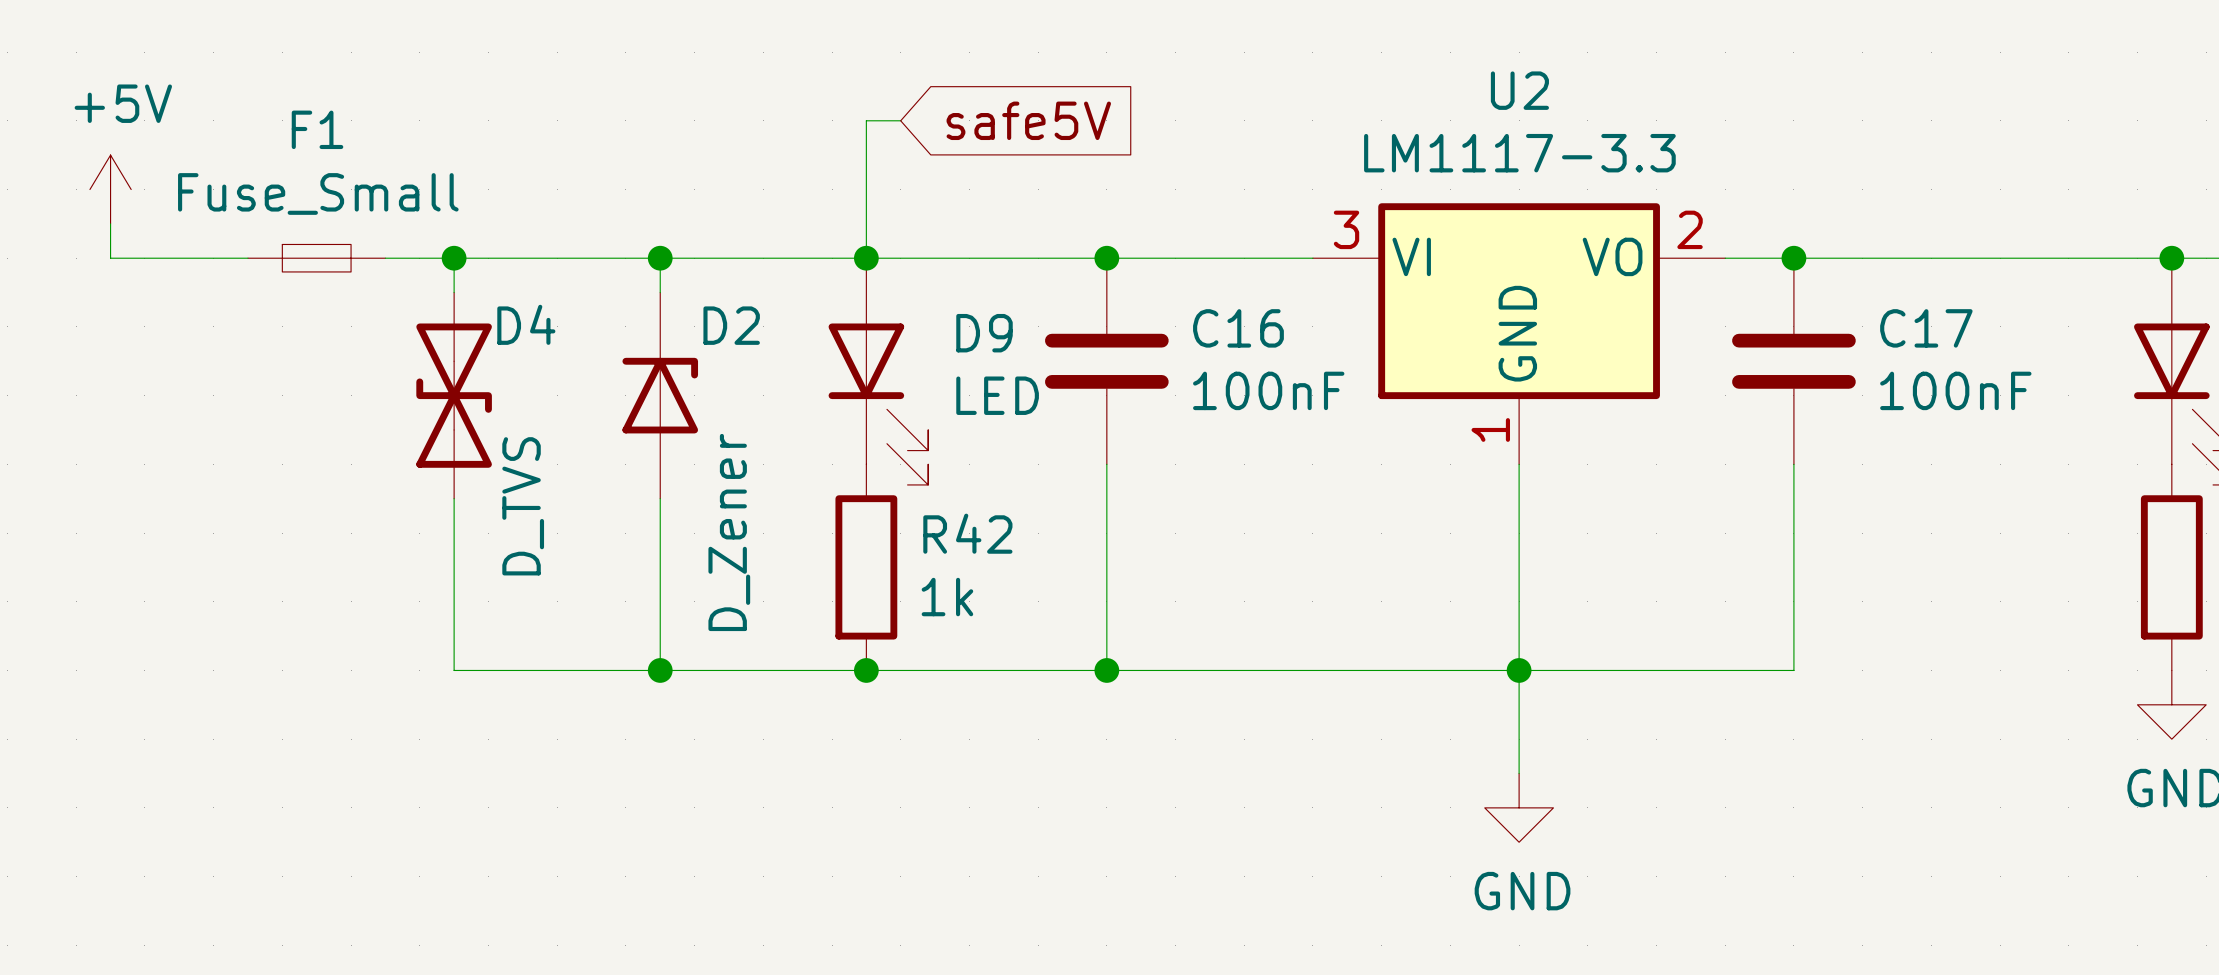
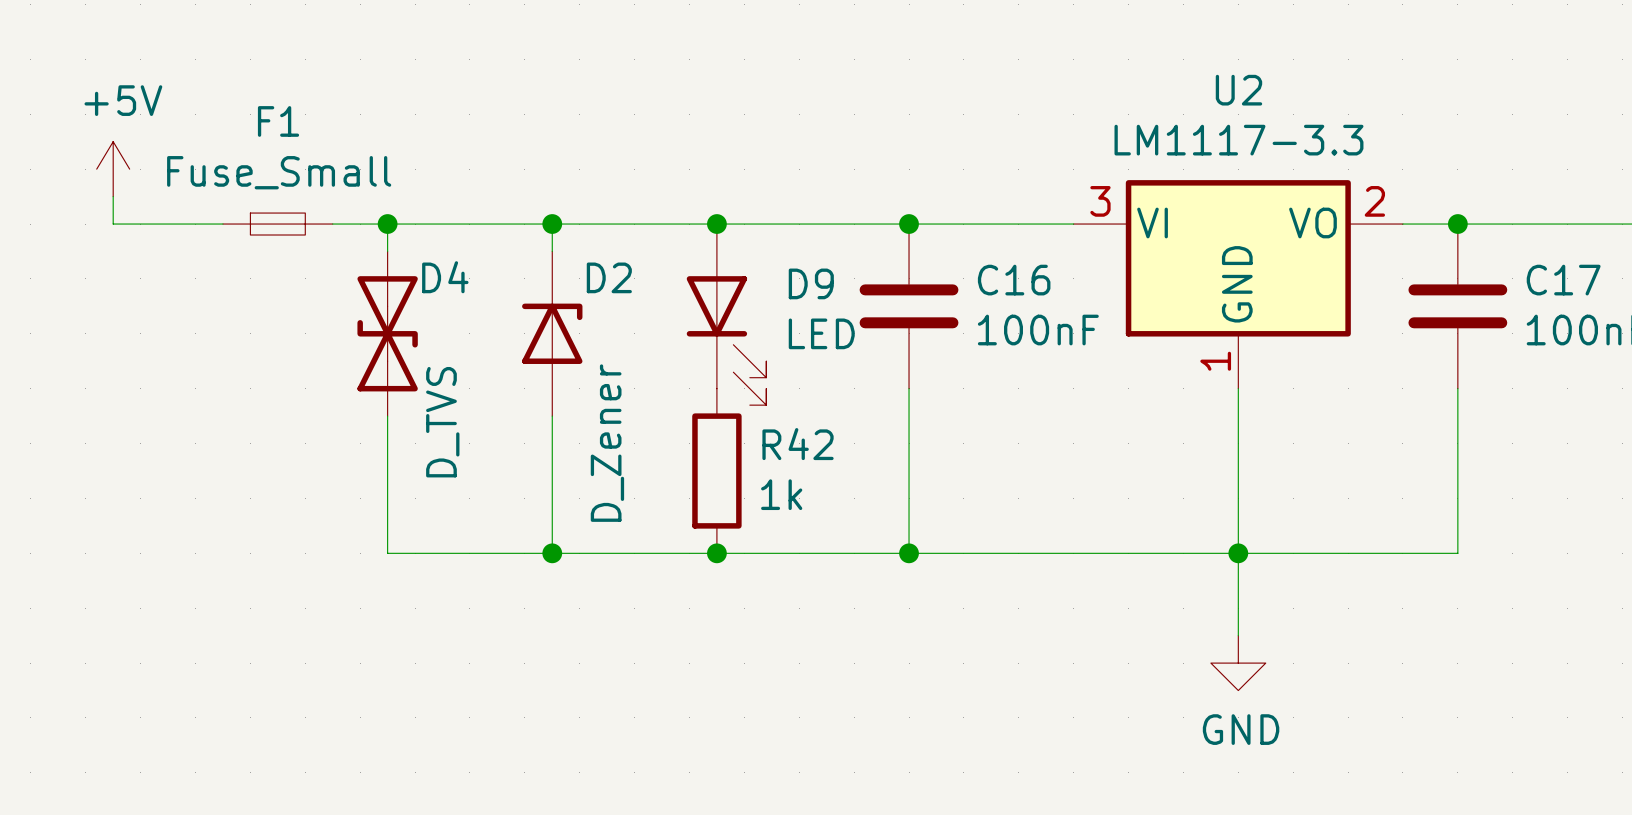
wire: (900, 120) (866, 120) (866, 258) -> none
global label: safe5V (1028, 120) -> none

